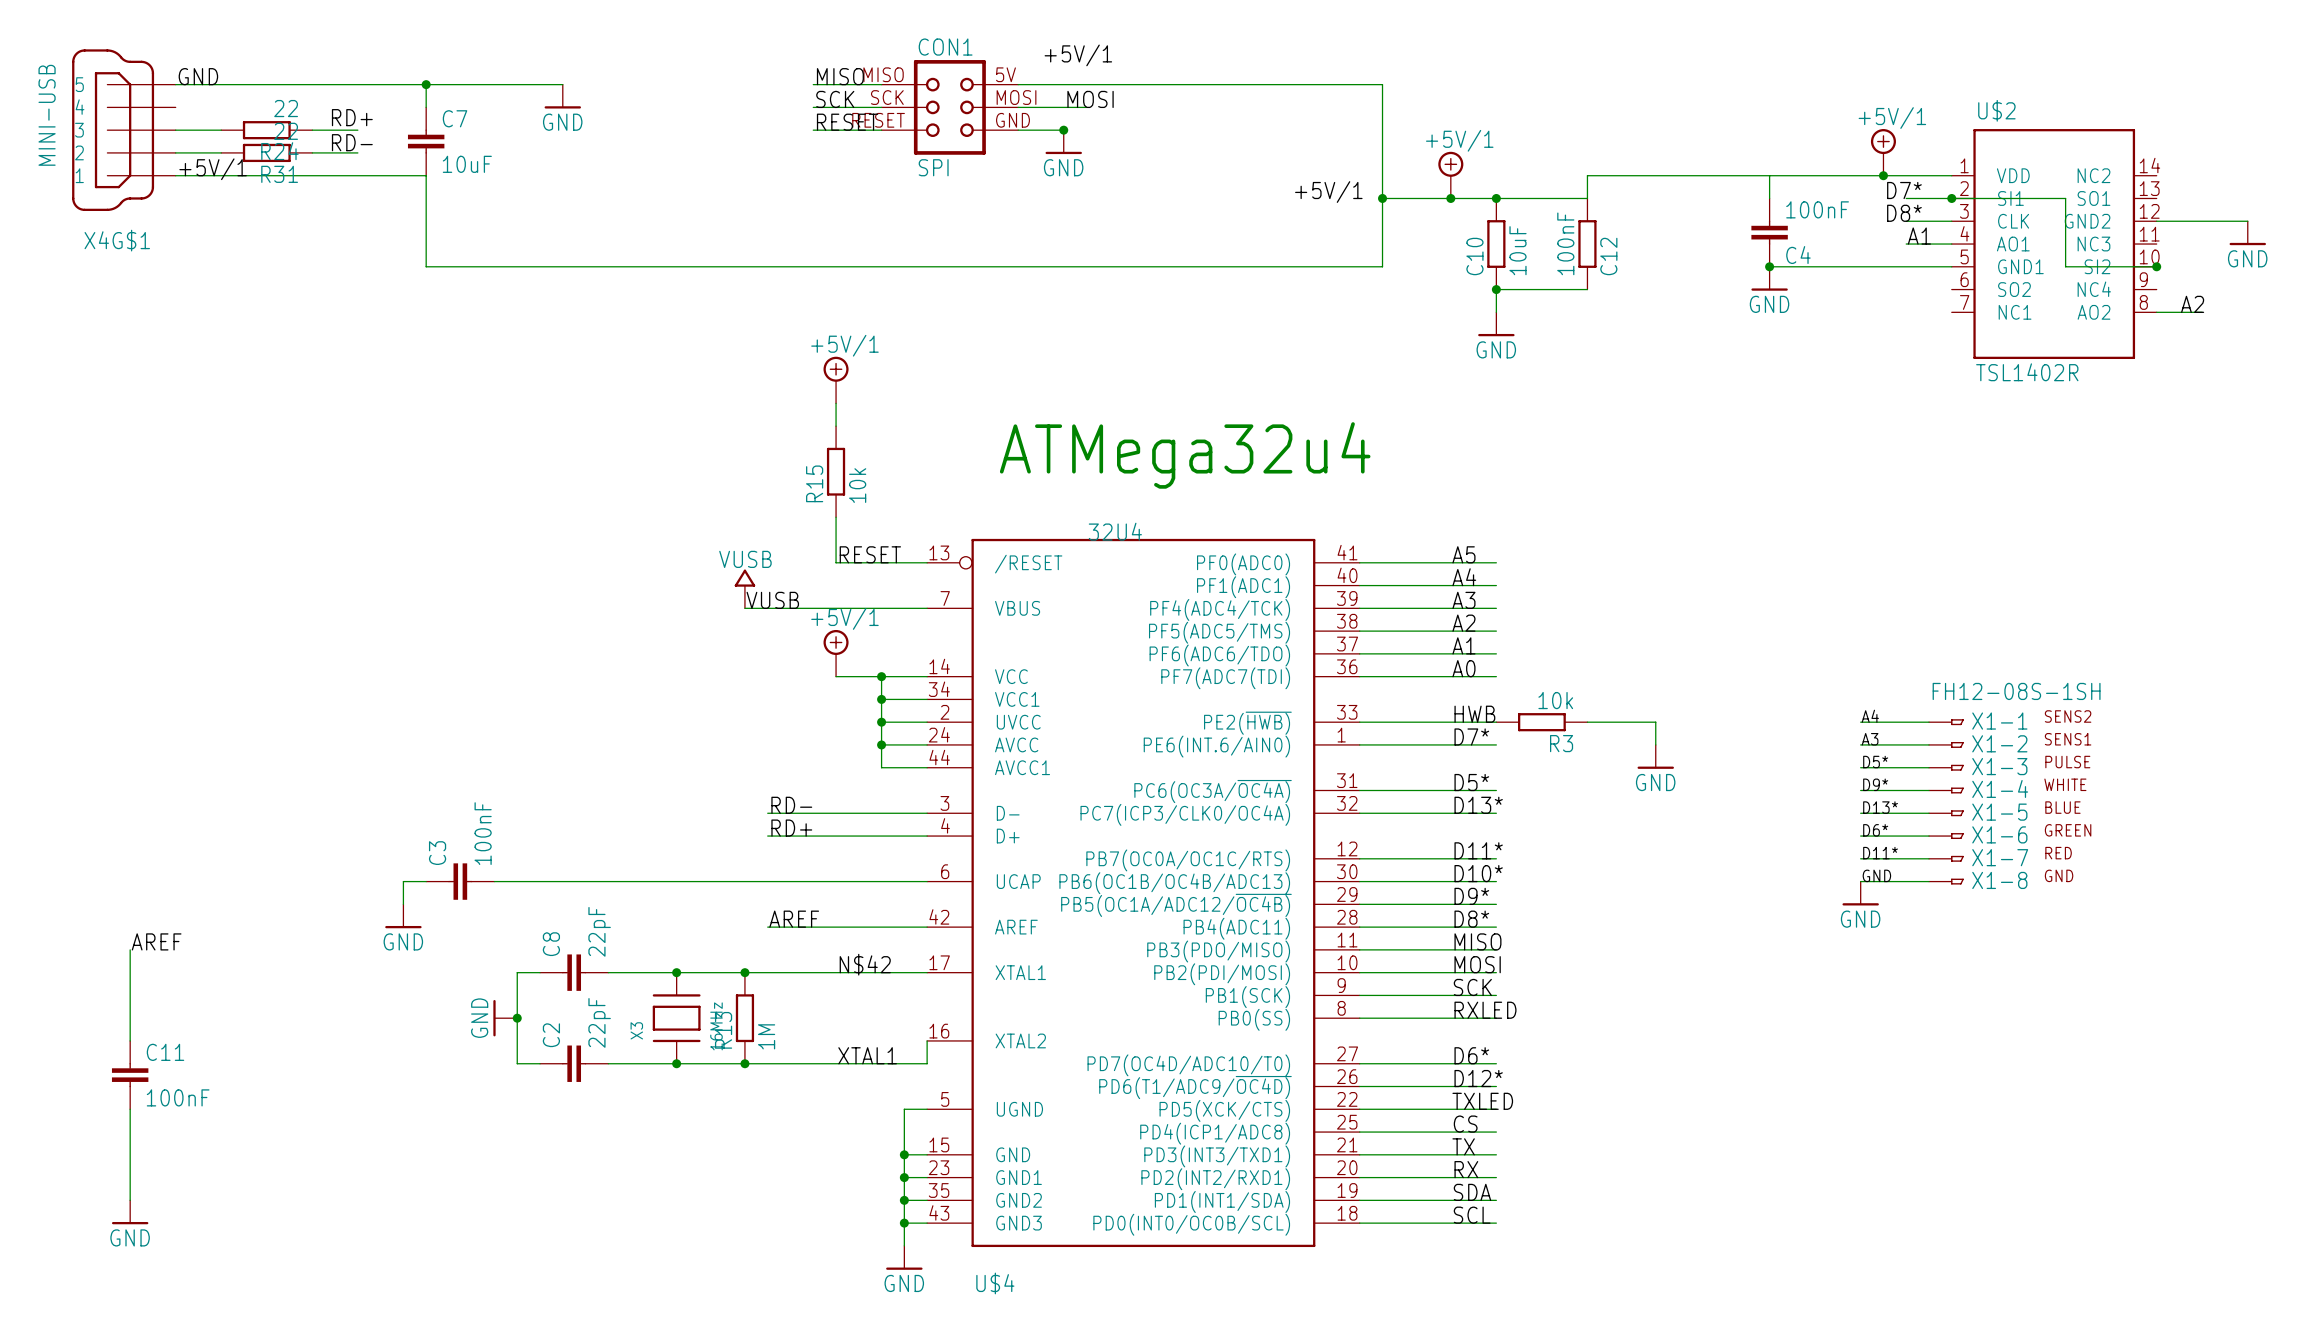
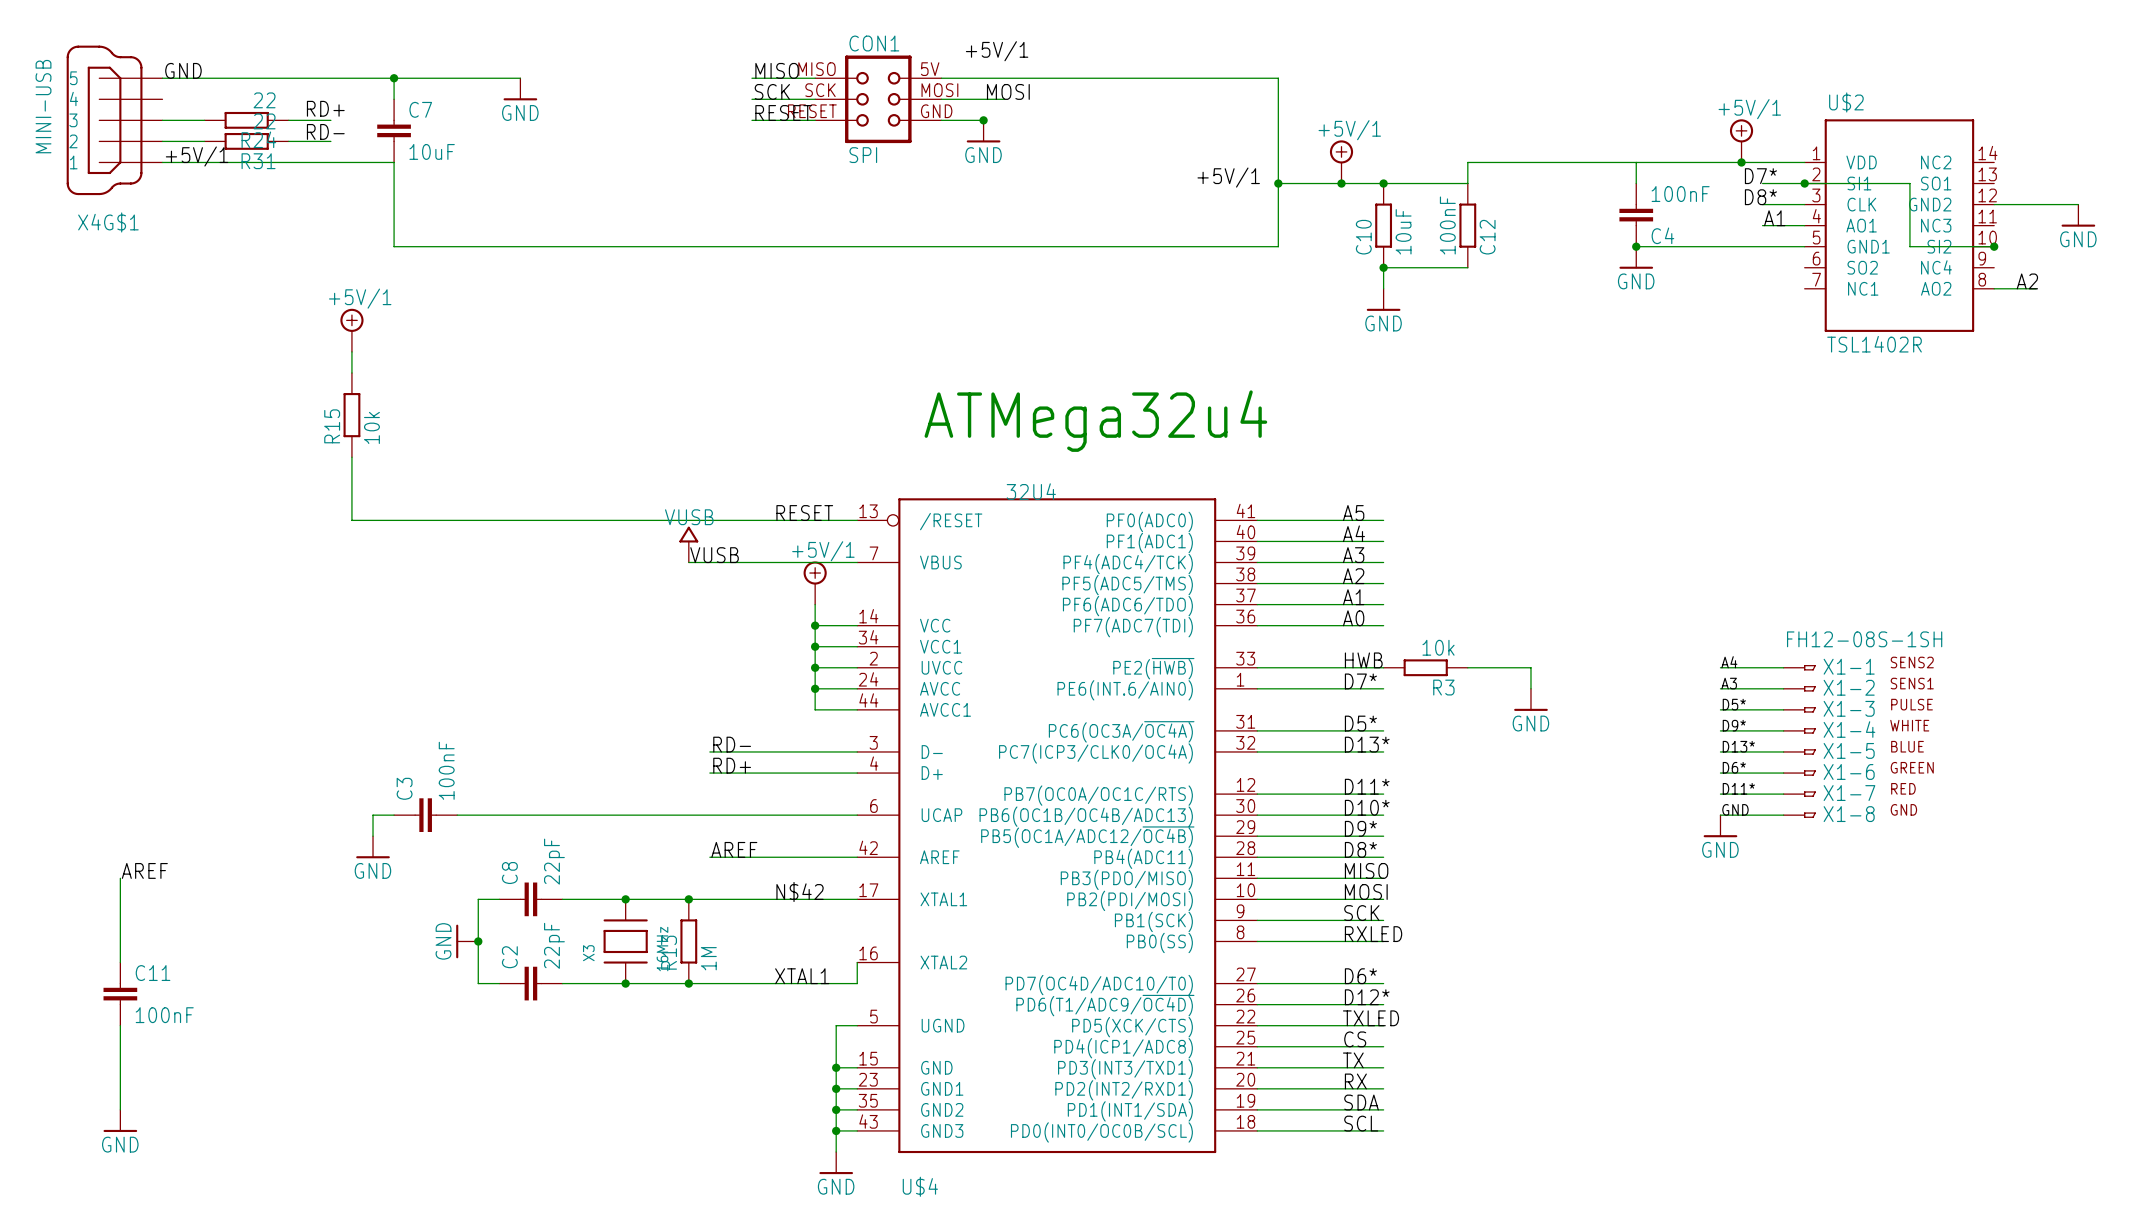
power symbol: none -> +5V/1 (351, 330)
wire: none -> (351, 351) (351, 373)
power symbol: +5V/1 (836, 380) -> none
wire: (836, 403) (836, 426) -> none
R15 position: (836, 471) -> (351, 415)
wire: (836, 517) (836, 562) -> (351, 457) (351, 520) (773, 520)
power symbol position: +5V/1 (836, 653) -> +5V/1 (815, 583)
wire: (836, 676) (881, 676) -> (815, 604) (815, 625)

